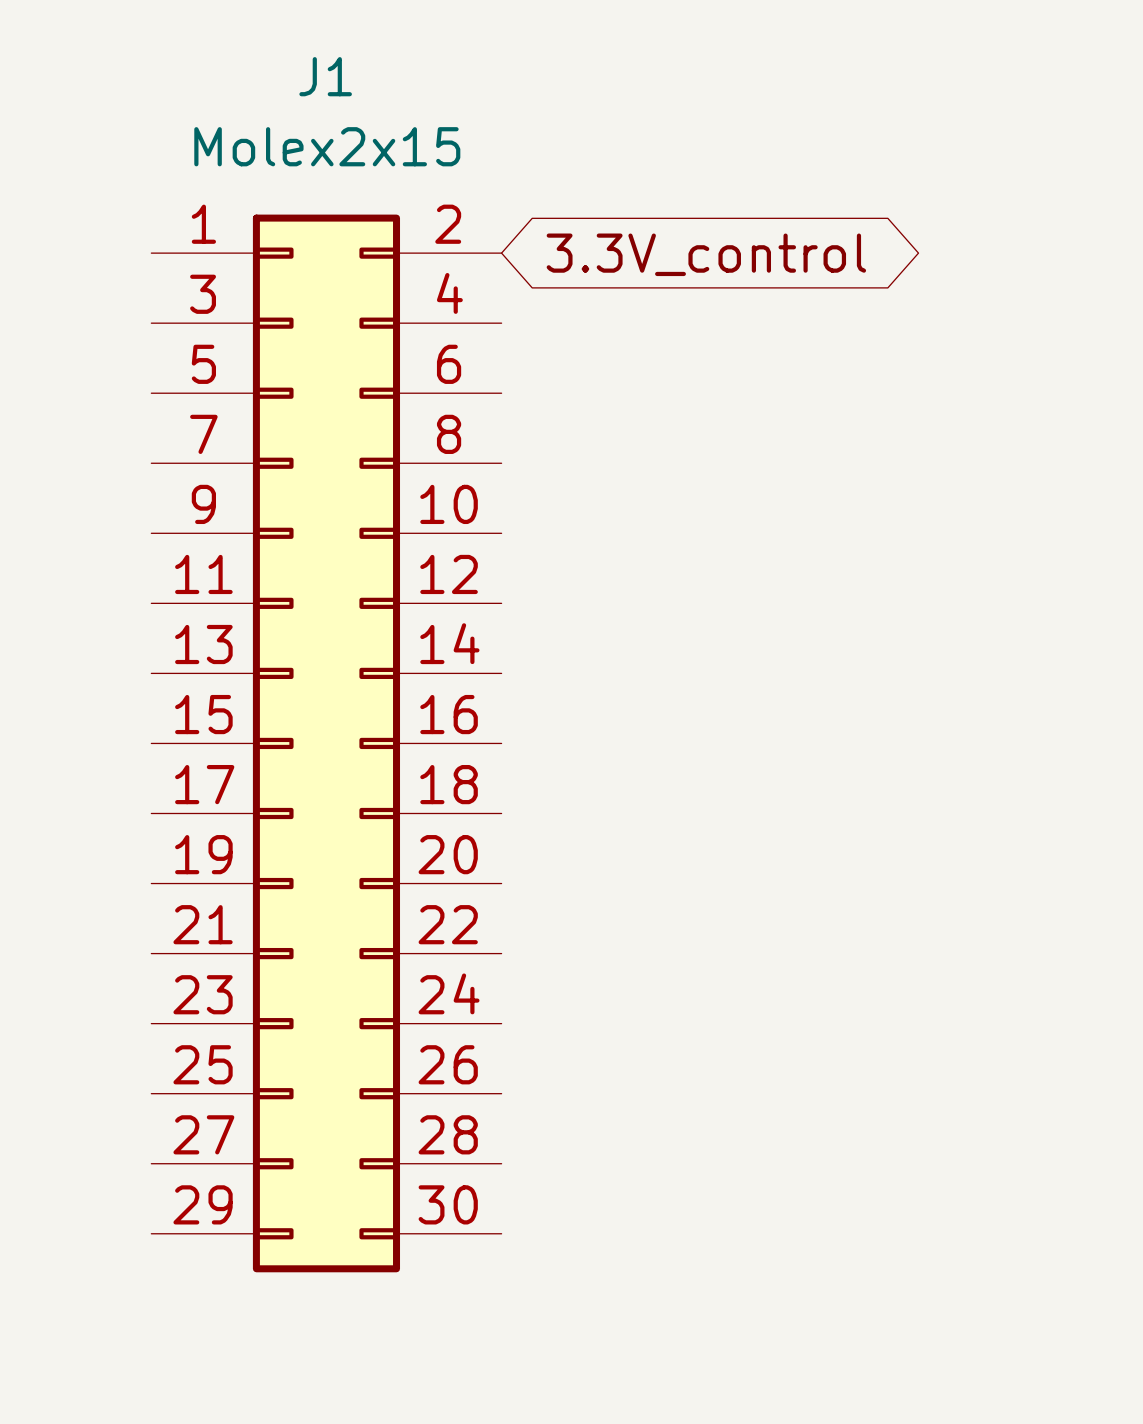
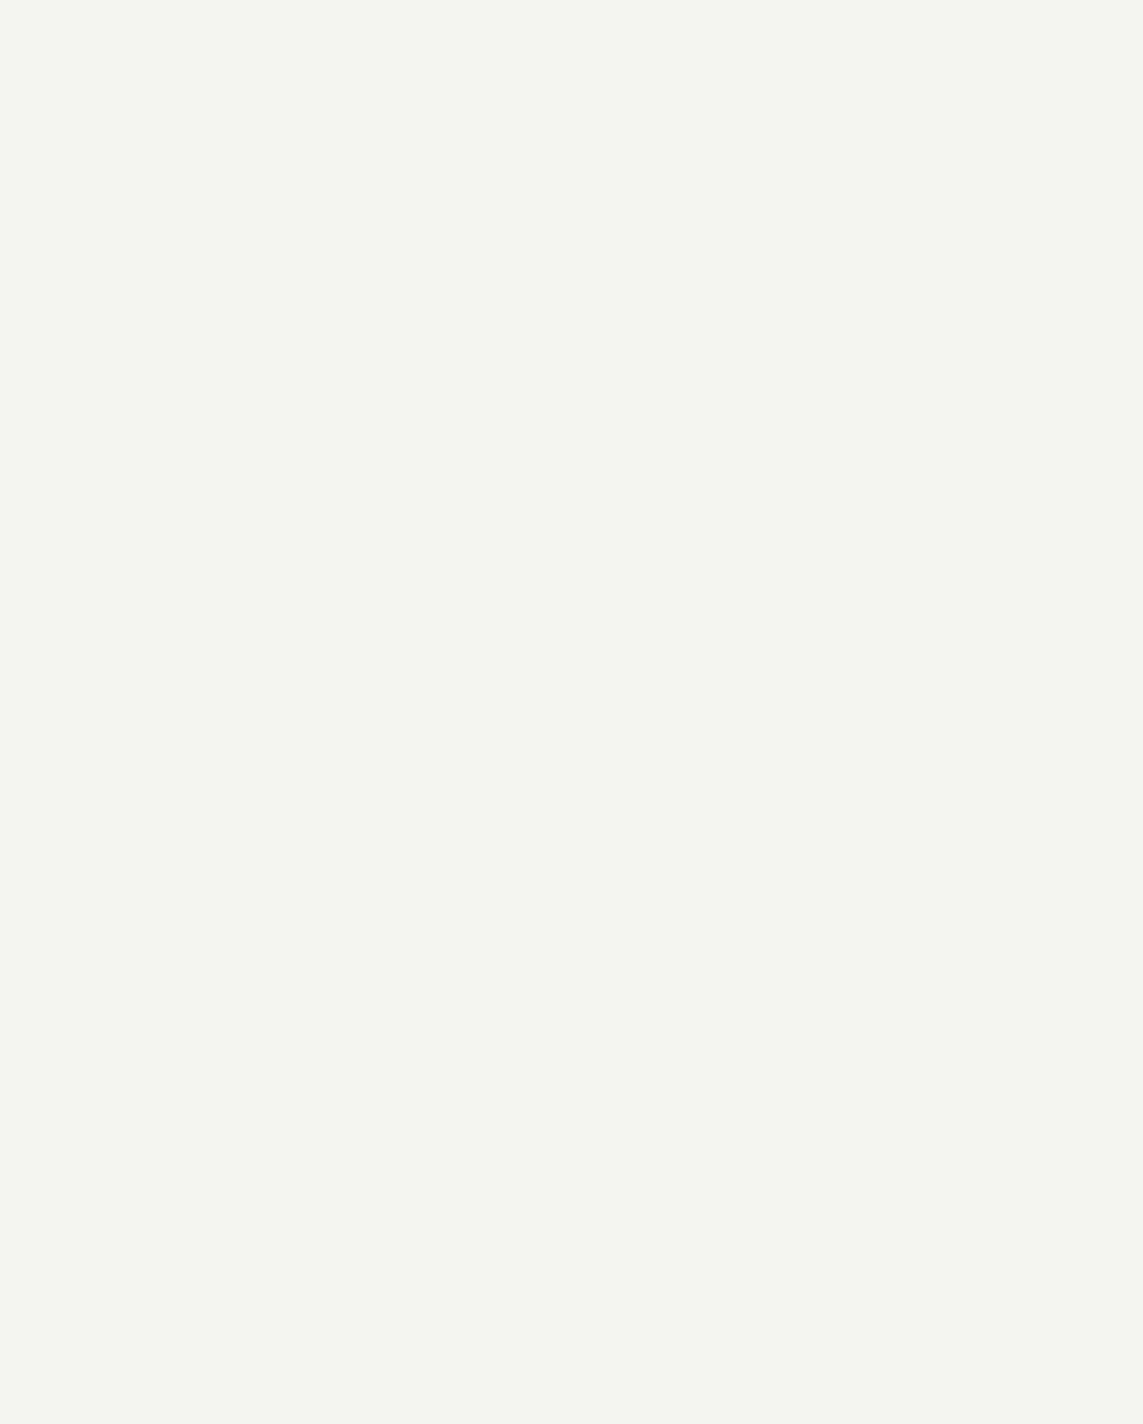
global label: 3.3V_control (706, 254) -> none
J1: Molex2x15 (326, 743) -> none

